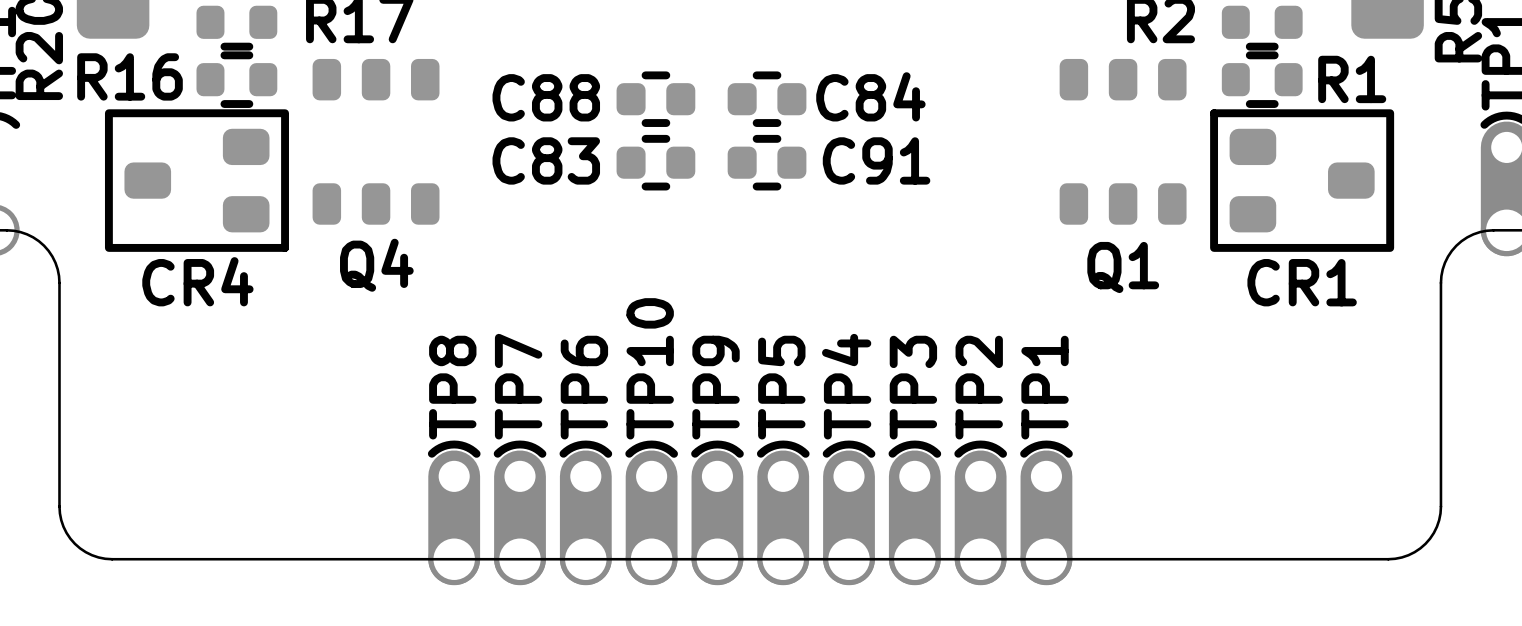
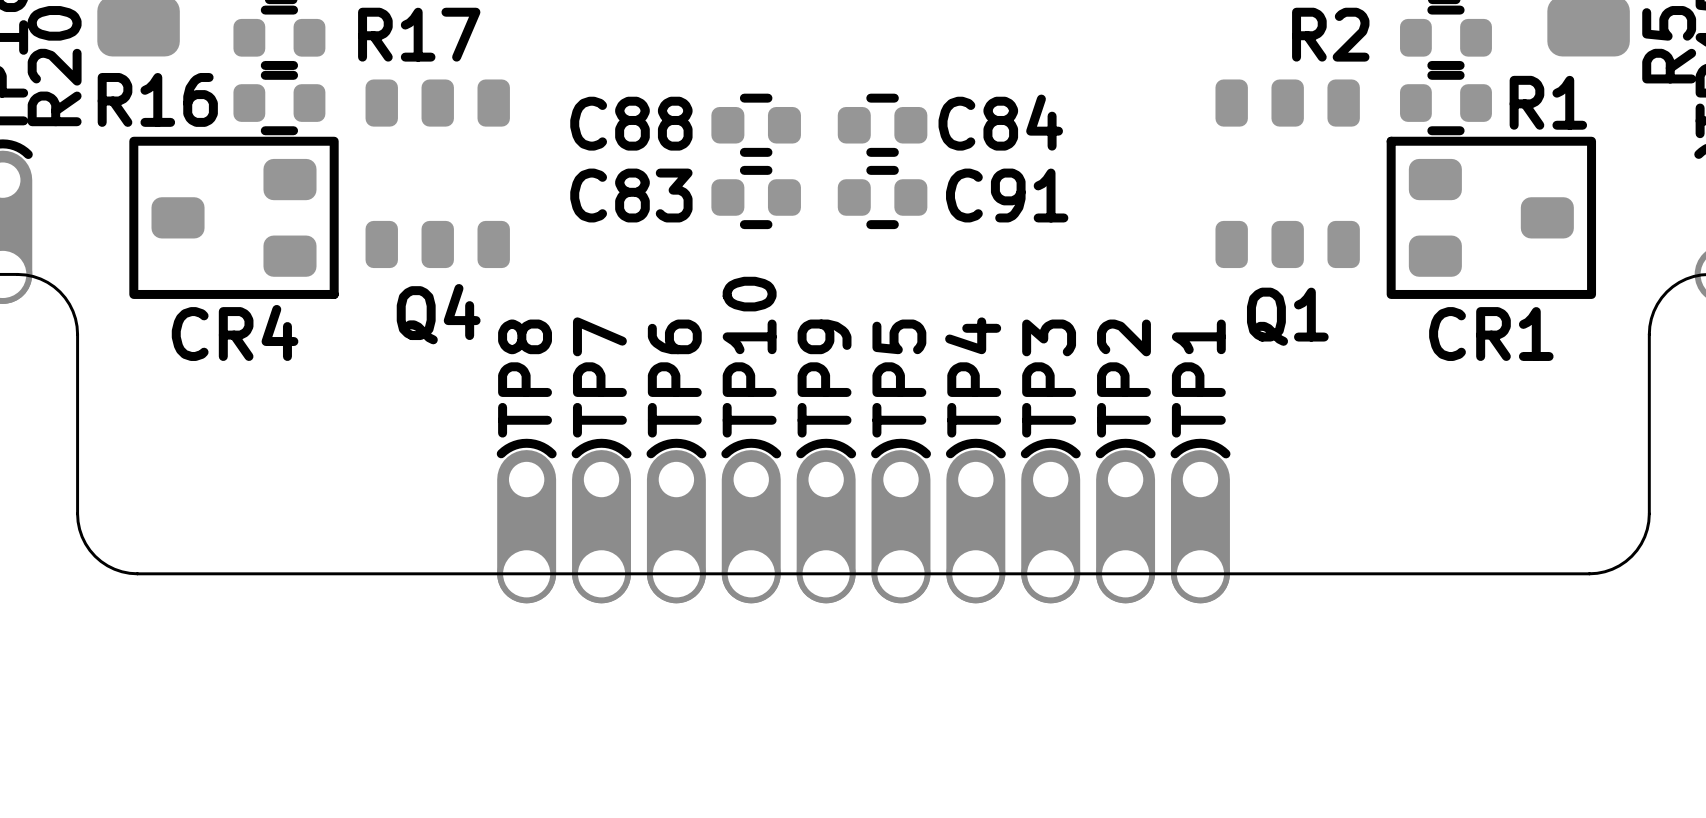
board edge: (59, 440) (59, 506) (63, 526) (70, 538) (80, 548) (98, 557) (112, 559) (1395, 558) (1408, 555) (1420, 548) (1430, 538) (1436, 526) (1440, 506) (1440, 440) -> (77, 513) (82, 536) (95, 556) (114, 569) (137, 573) (1589, 573) (1612, 569) (1631, 556) (1644, 536) (1649, 513)
TP8 position: (454, 512) -> (526, 521)
TP7 position: (520, 512) -> (601, 521)
TP6 position: (585, 512) -> (676, 521)
TP10 position: (651, 512) -> (751, 521)
TP9 position: (717, 512) -> (826, 521)
TP5 position: (783, 512) -> (901, 521)
TP4 position: (849, 512) -> (975, 521)
TP3 position: (914, 512) -> (1050, 521)
TP2 position: (980, 512) -> (1125, 521)
TP1 position: (1046, 512) -> (1200, 521)

